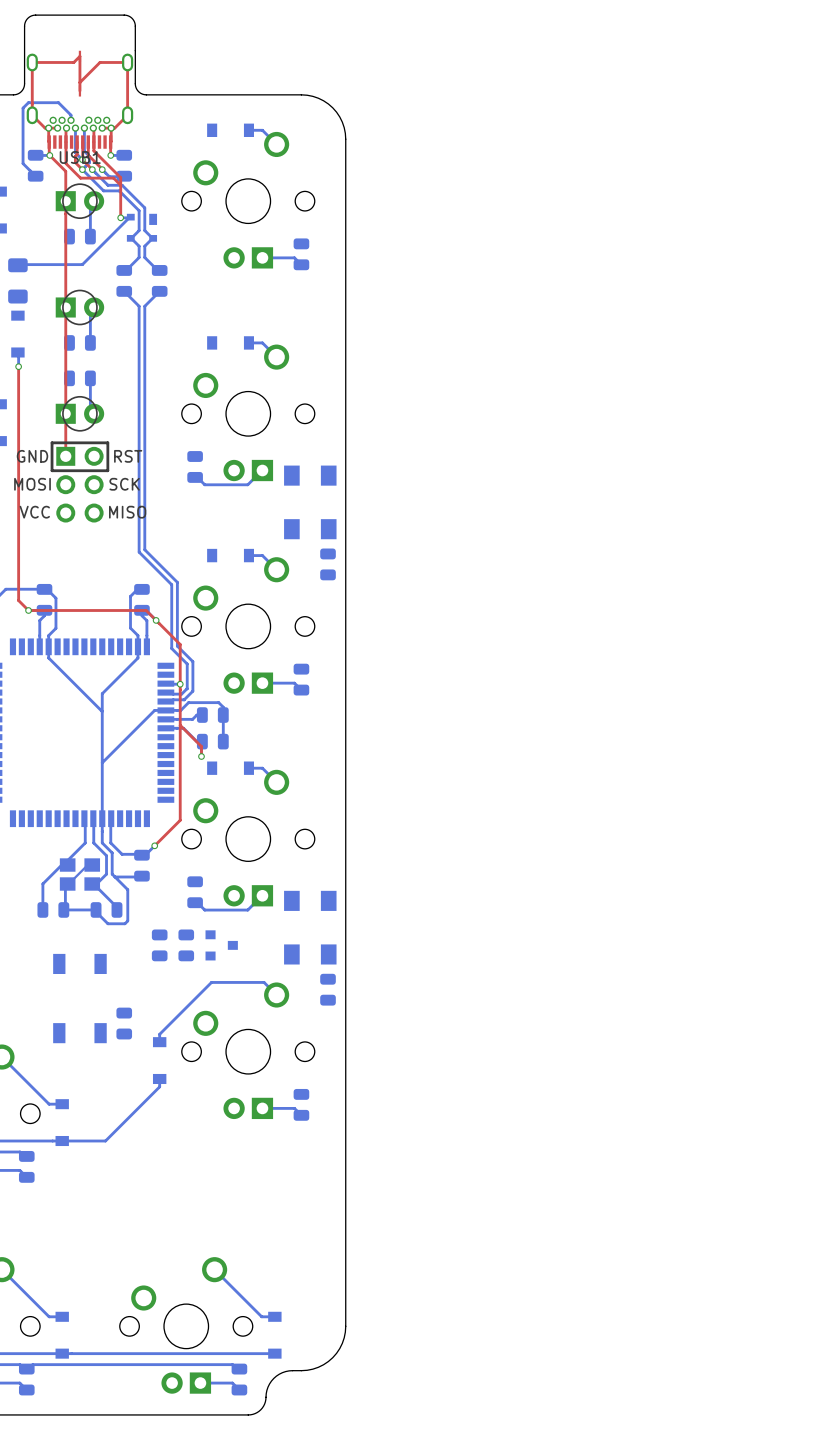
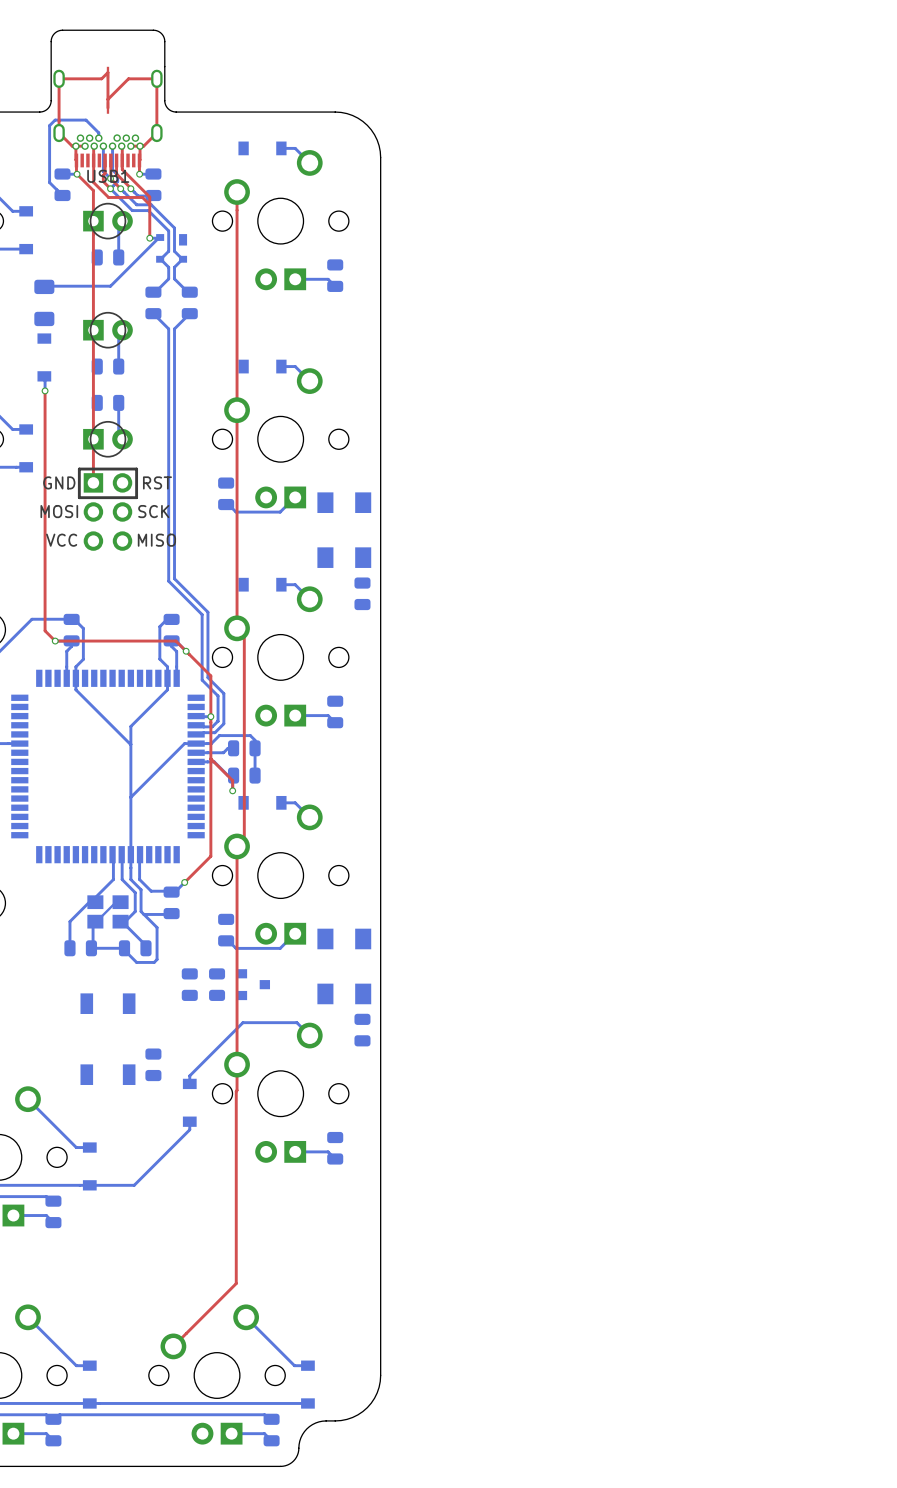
top track: none -> (237, 192) (237, 629) (244, 636) (244, 838) (237, 846) (236, 1283) (173, 1346)

